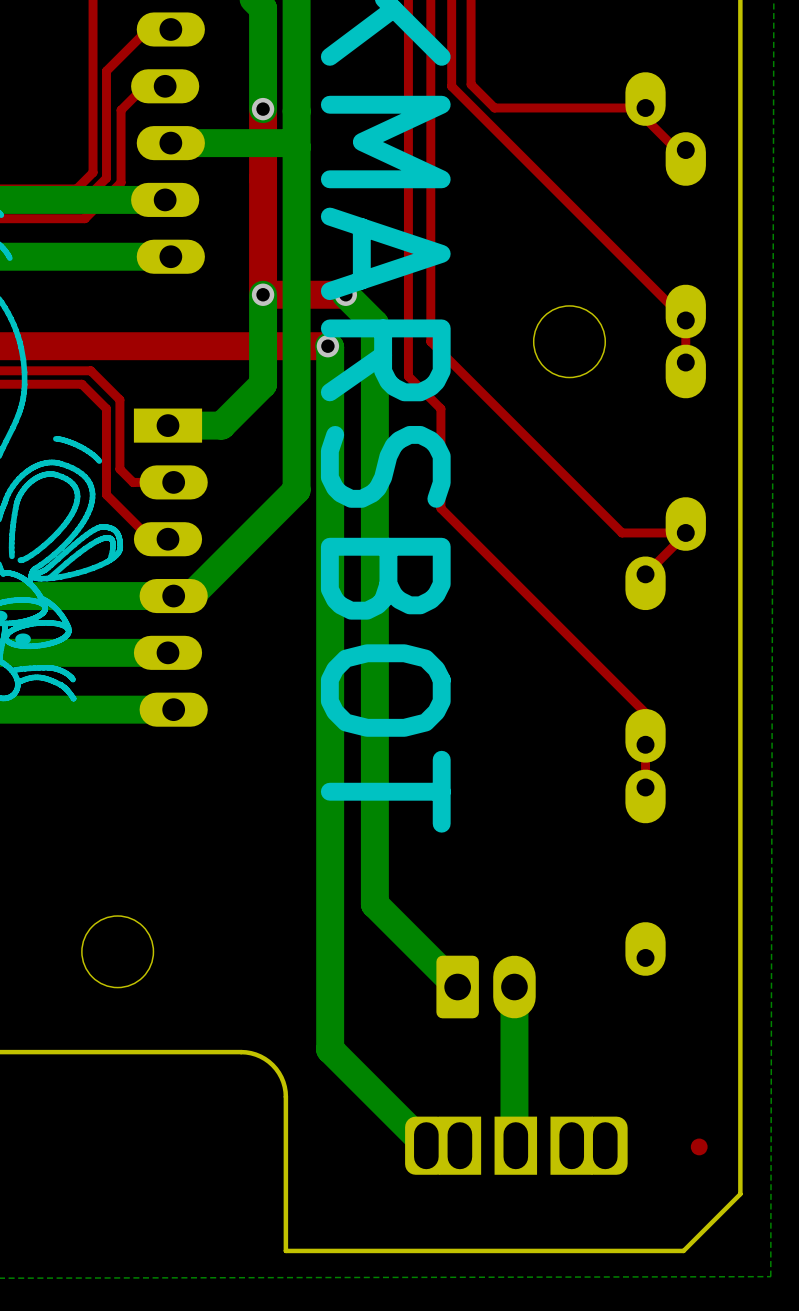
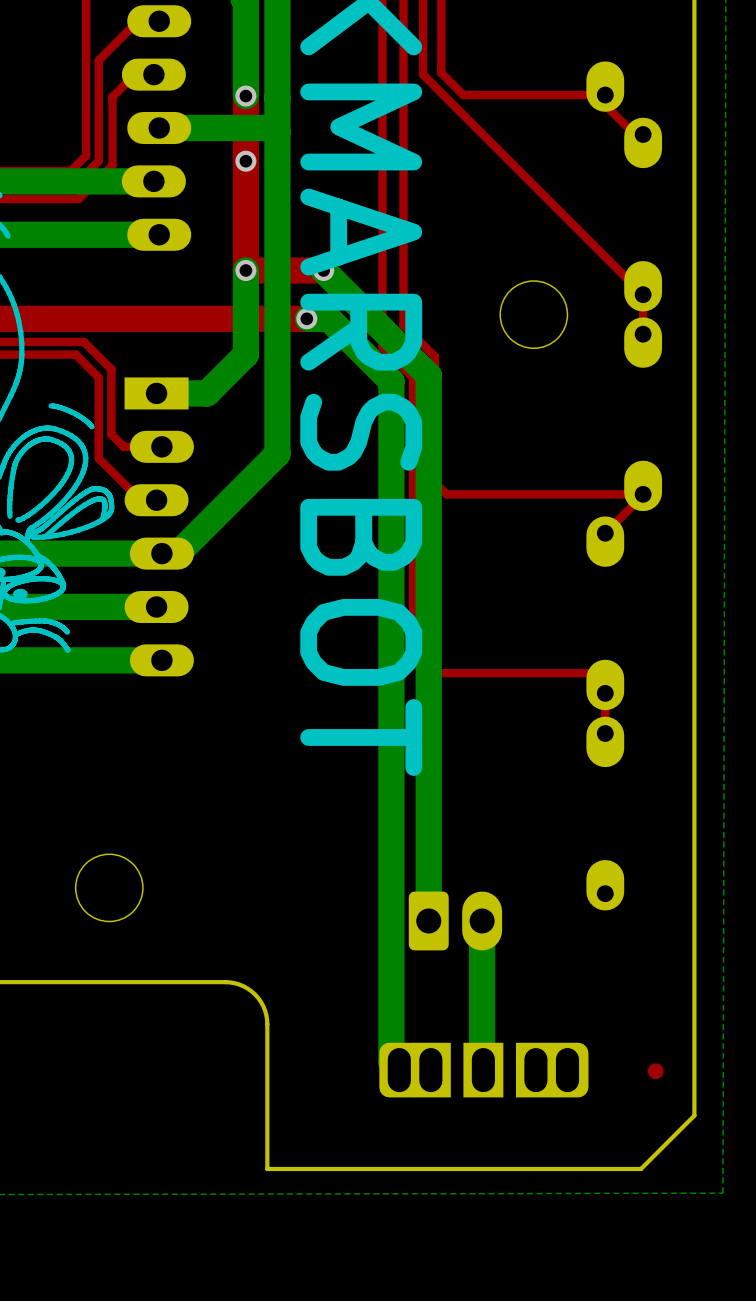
via: none -> (245, 161)
bottom track: (374, 323) (374, 904) (457, 987) -> (350, 297) (428, 375) (428, 920)
top track: (430, 341) (622, 532) -> (403, 314) (403, 325) (435, 356) (435, 482) (446, 494) (583, 494)
bottom track: (329, 346) (330, 1049) (417, 1137) -> (307, 318) (328, 318) (391, 381) (391, 1062)
top track: (440, 508) (645, 713) (645, 723) -> (413, 471) (413, 653) (433, 673) (605, 673)

